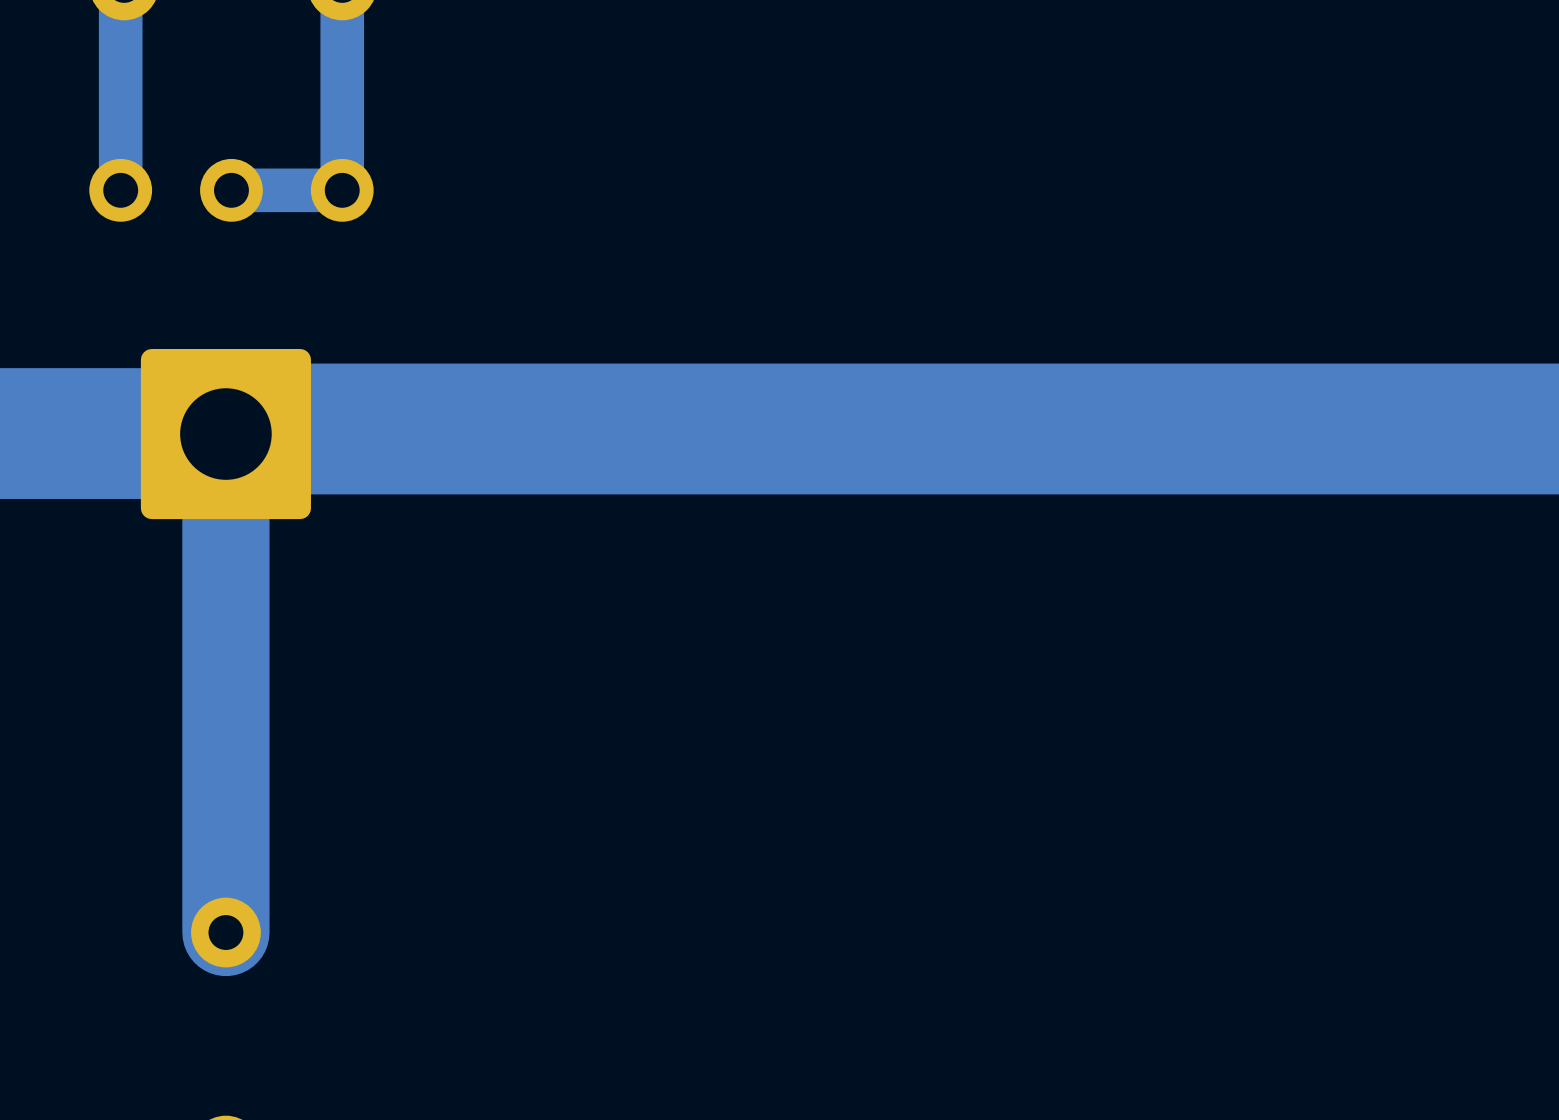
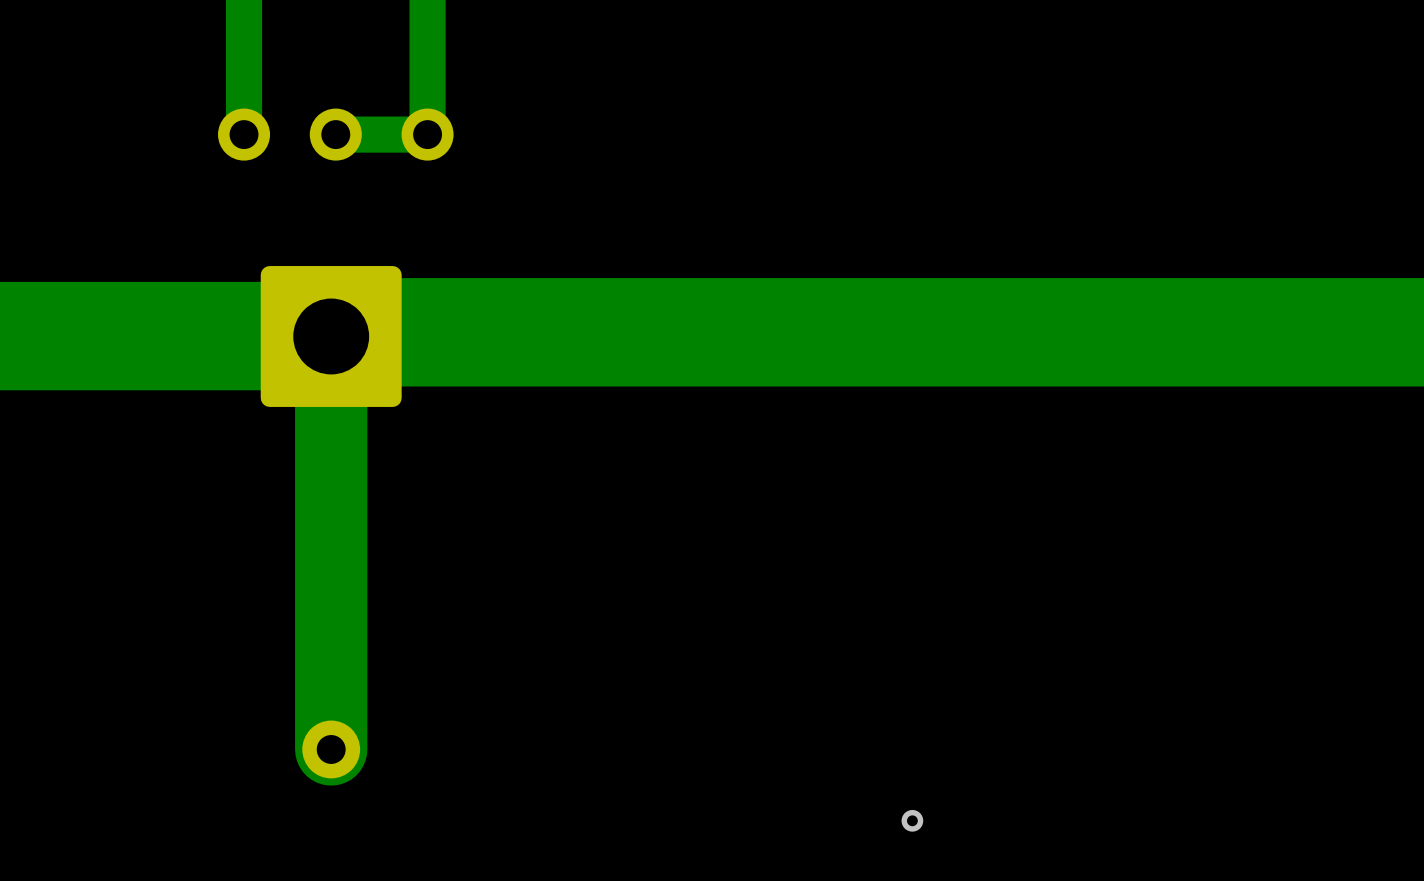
via: none -> (912, 820)

